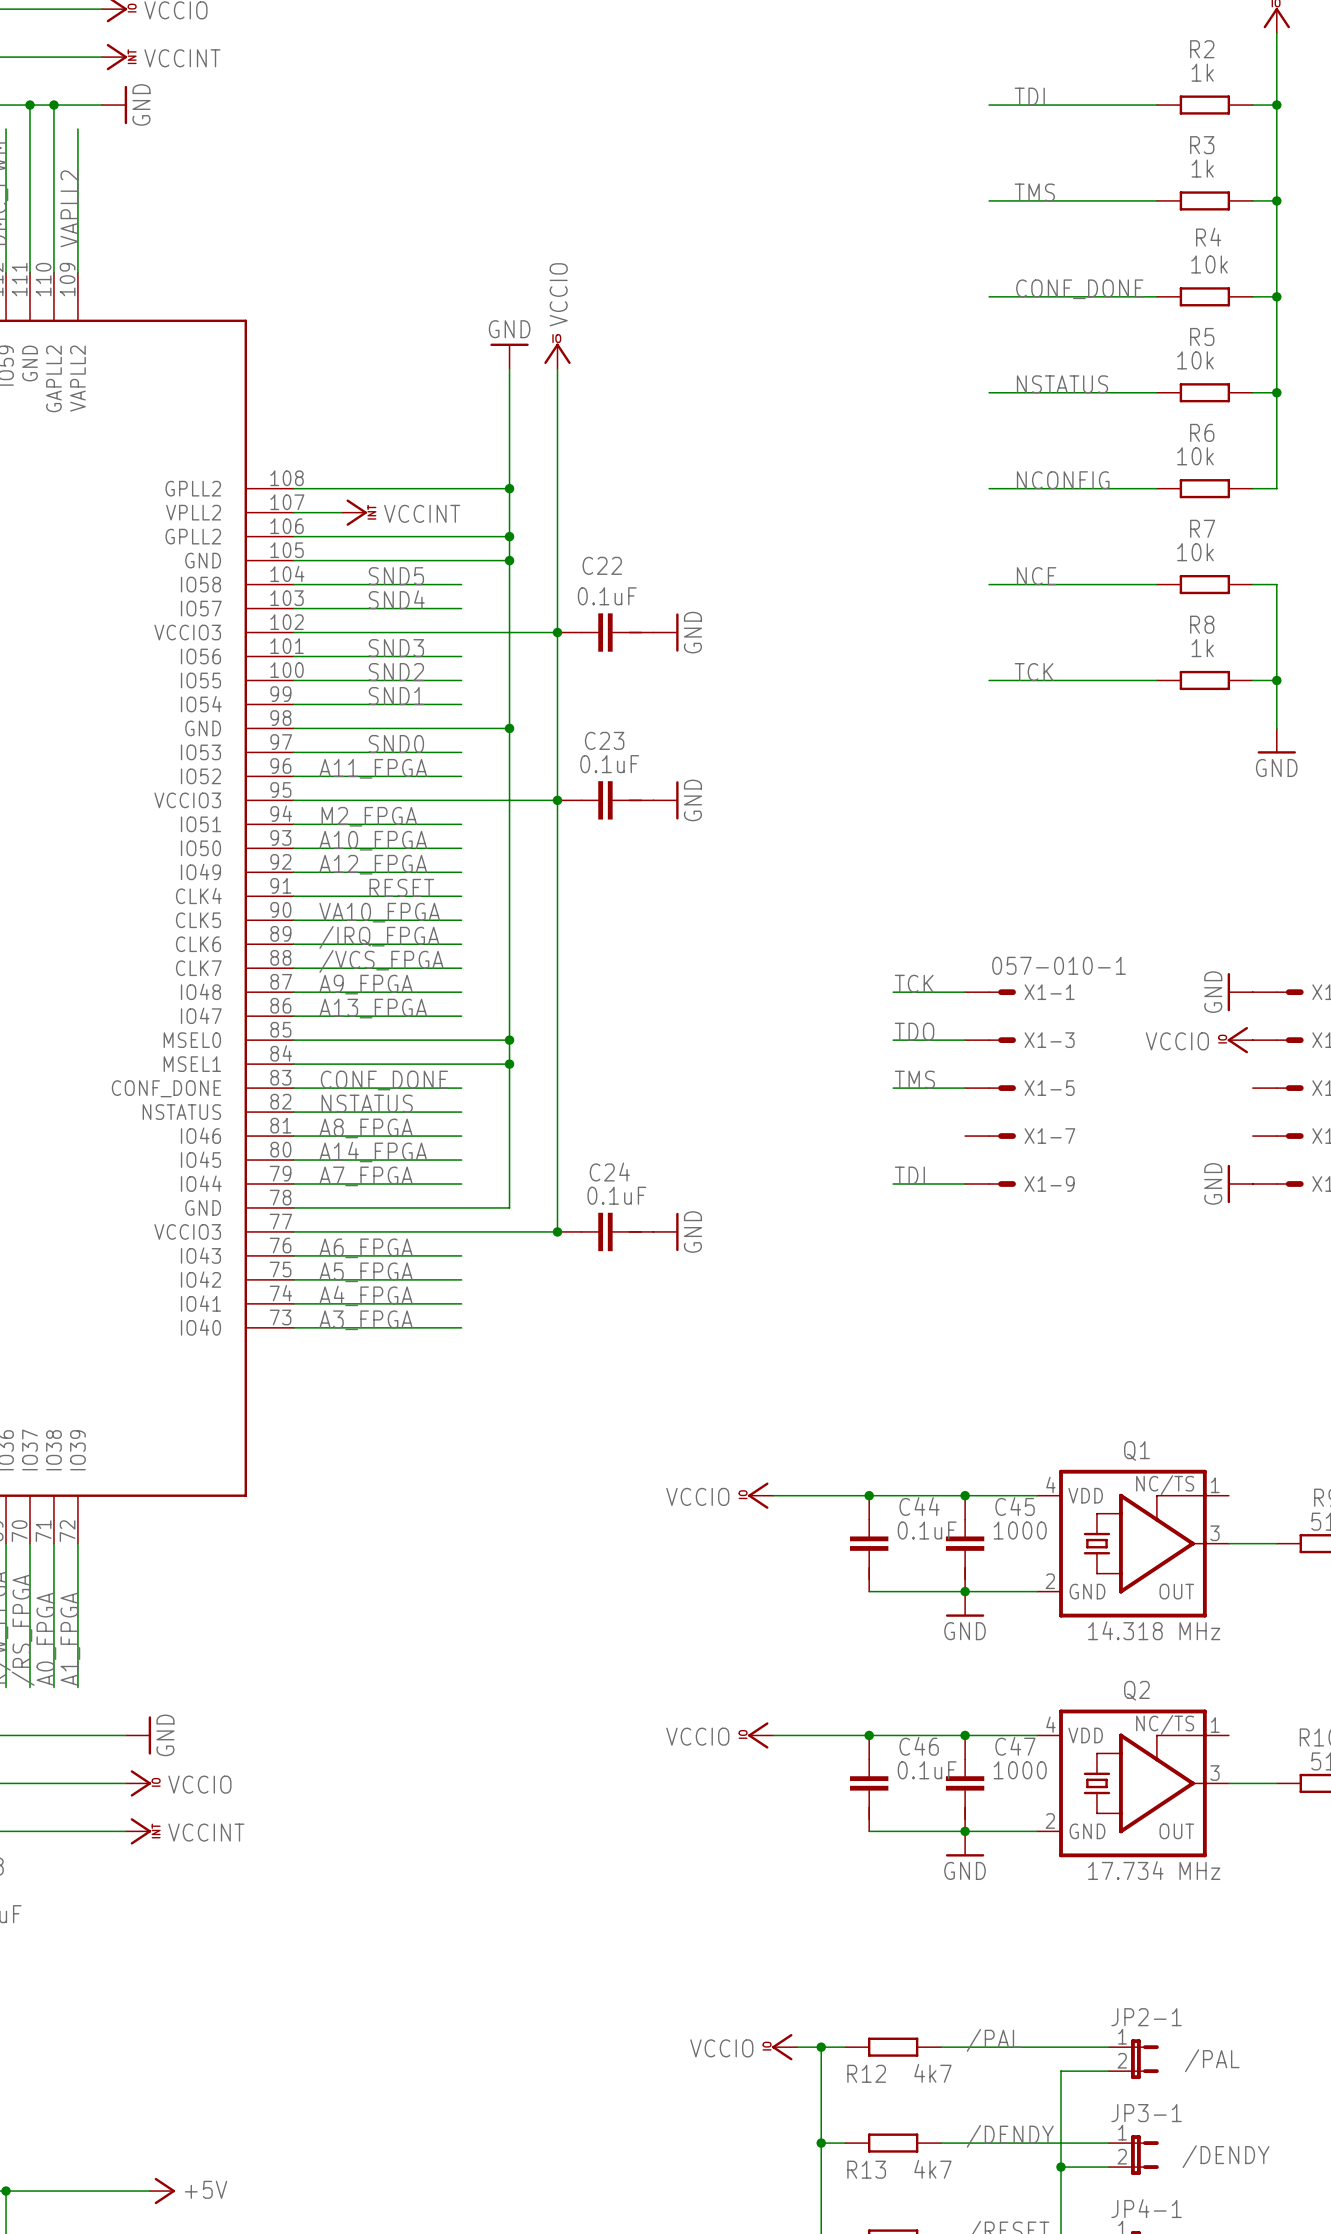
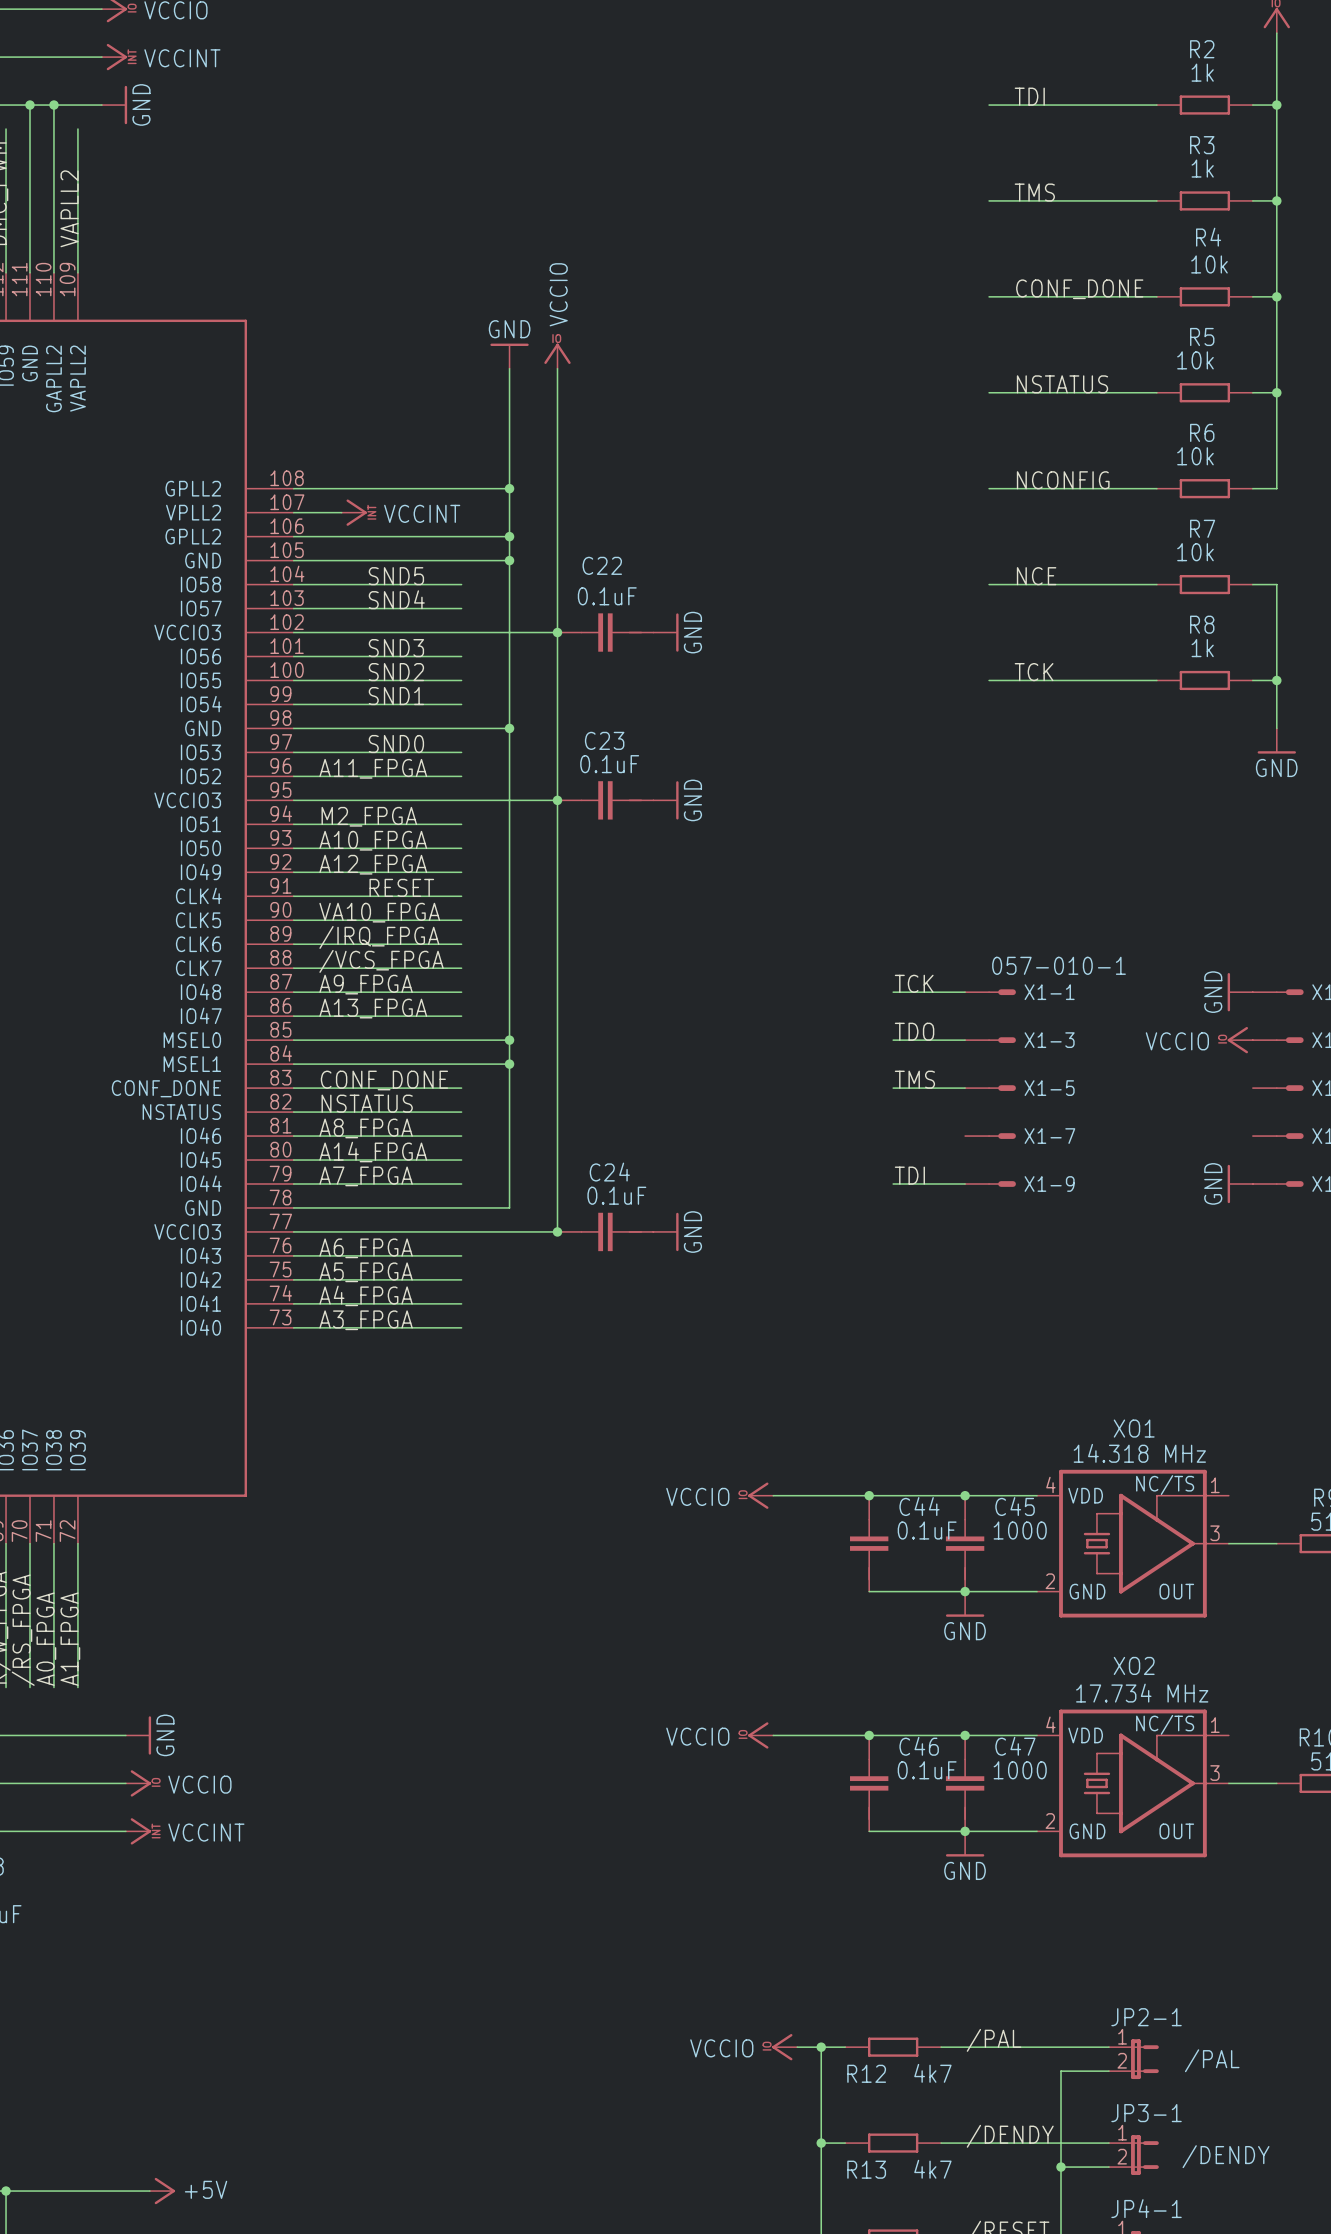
Q1 name: Q1 (1136, 1450) -> XO1 (1134, 1428)
Q1 value position: 14.318 MHz (1154, 1630) -> 14.318 MHz (1139, 1453)
Q2 name: Q2 (1136, 1690) -> XO2 (1134, 1665)
Q2 value position: 17.734 MHz (1154, 1870) -> 17.734 MHz (1142, 1693)

